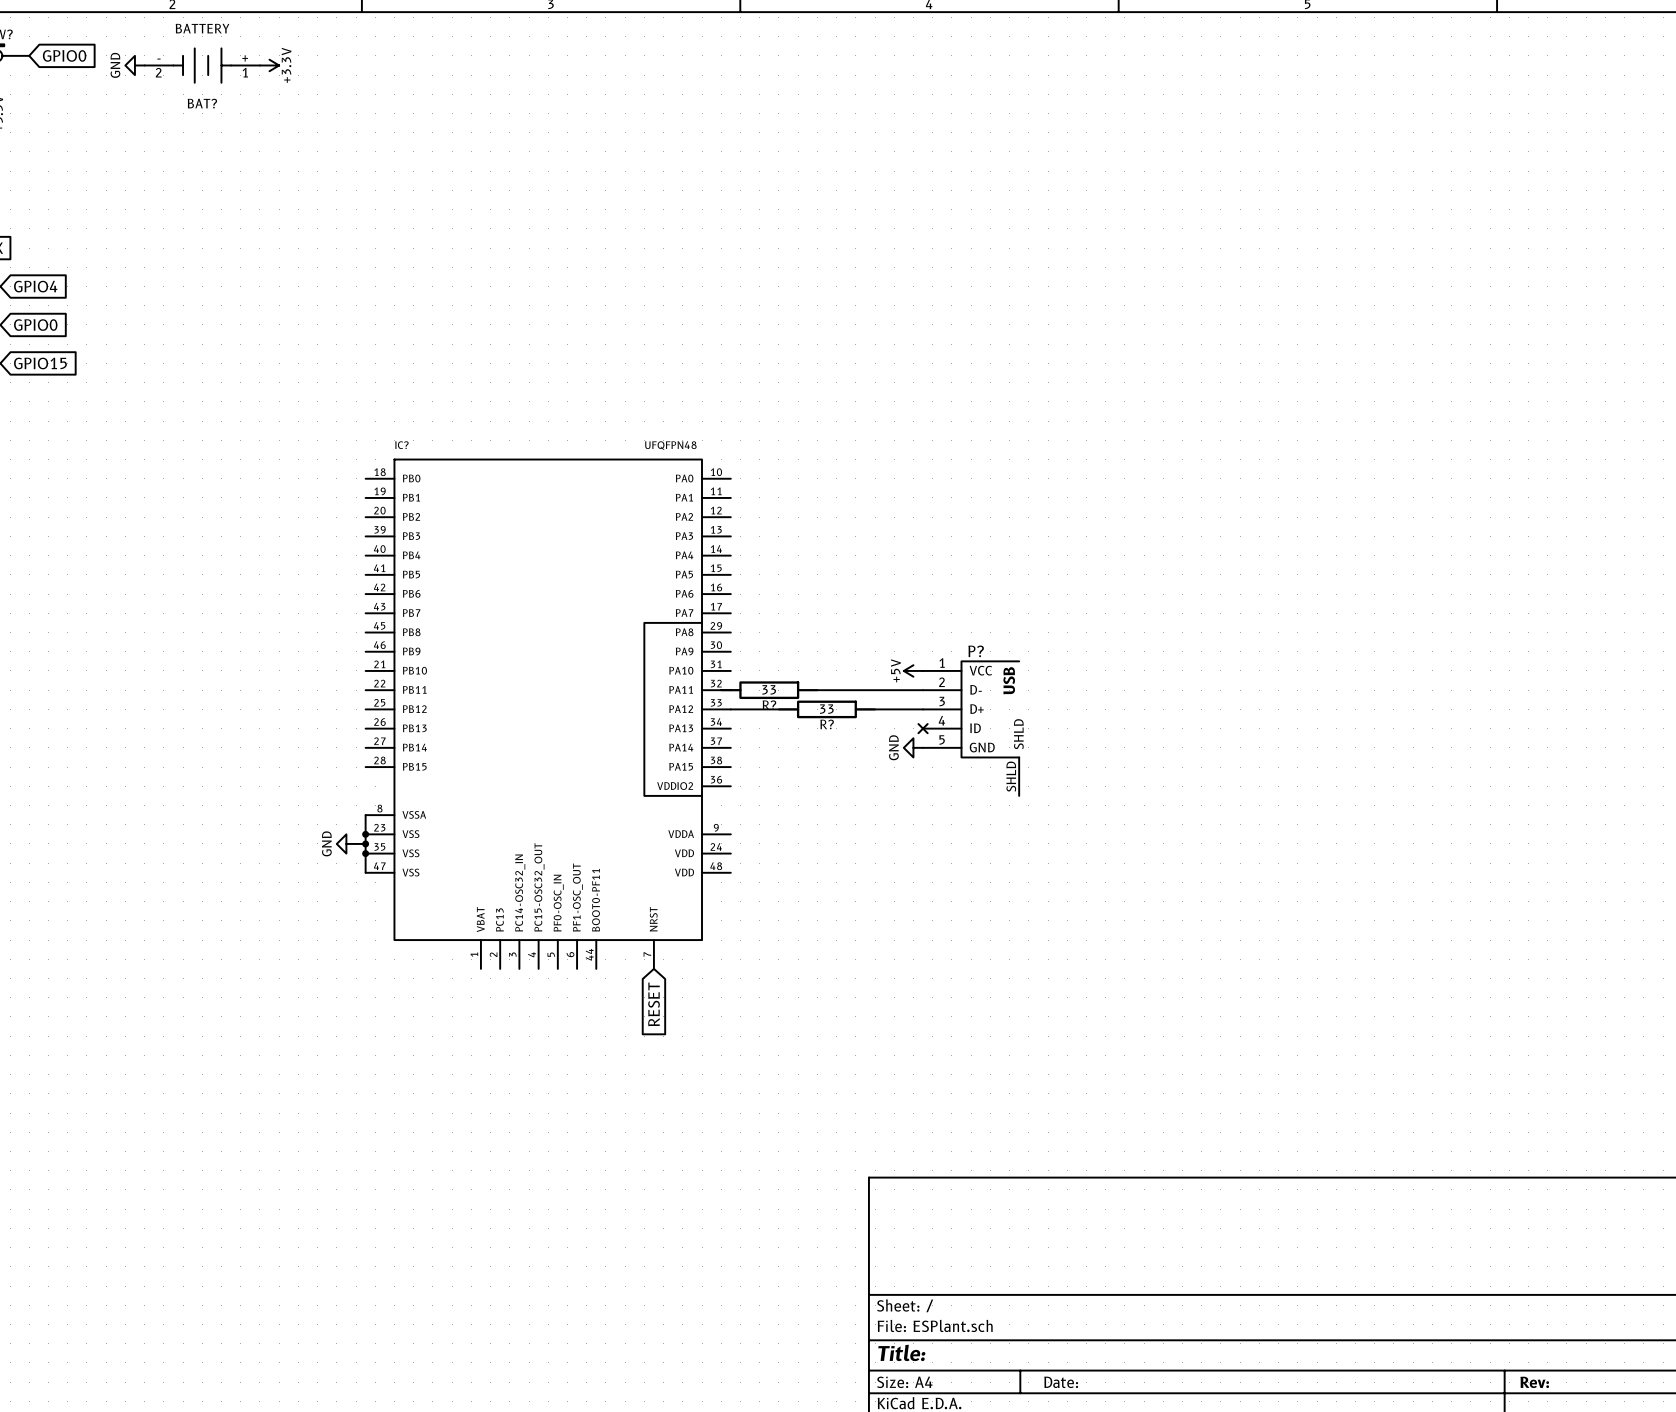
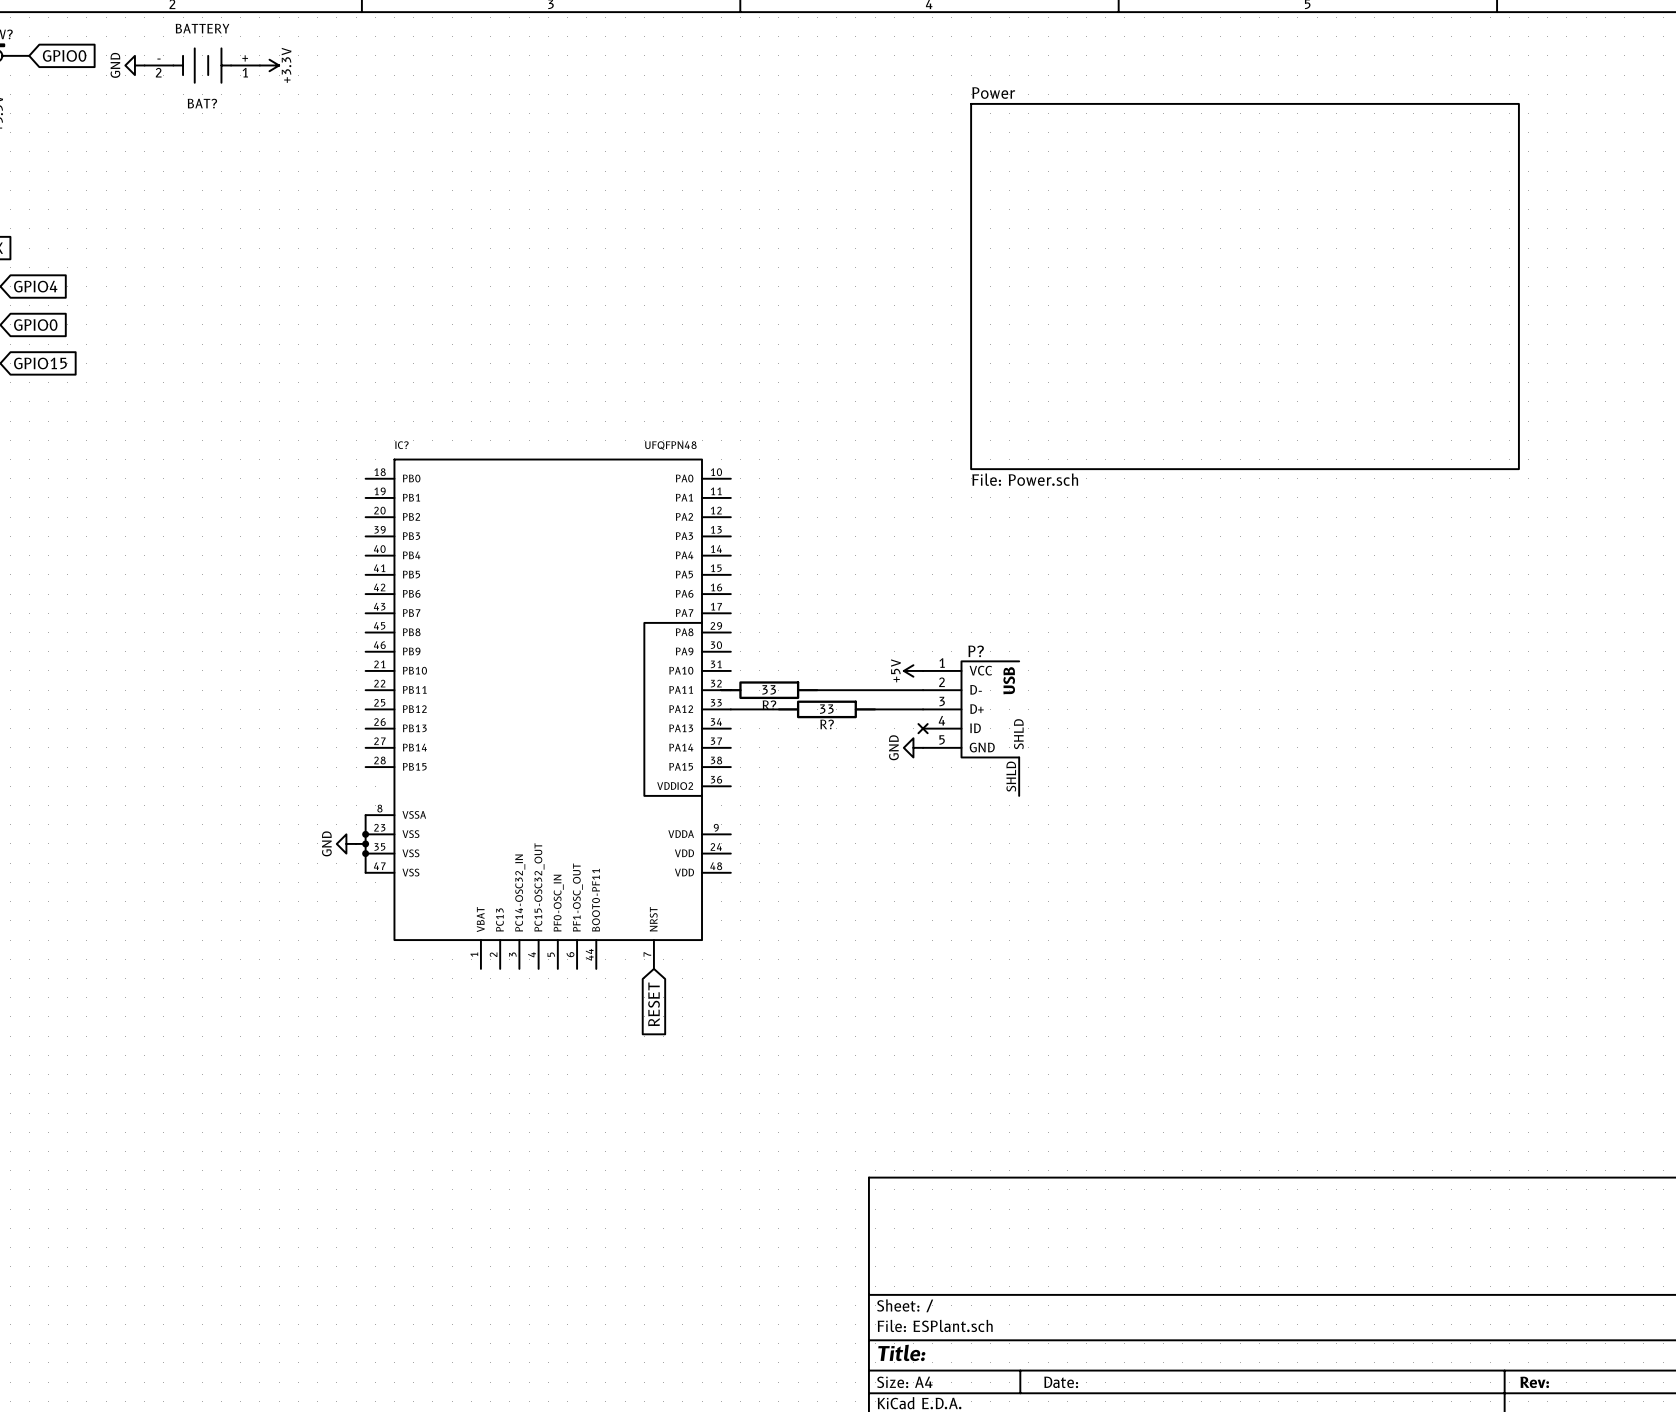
sheet Power: none -> File: Power.sch (1245, 286)

